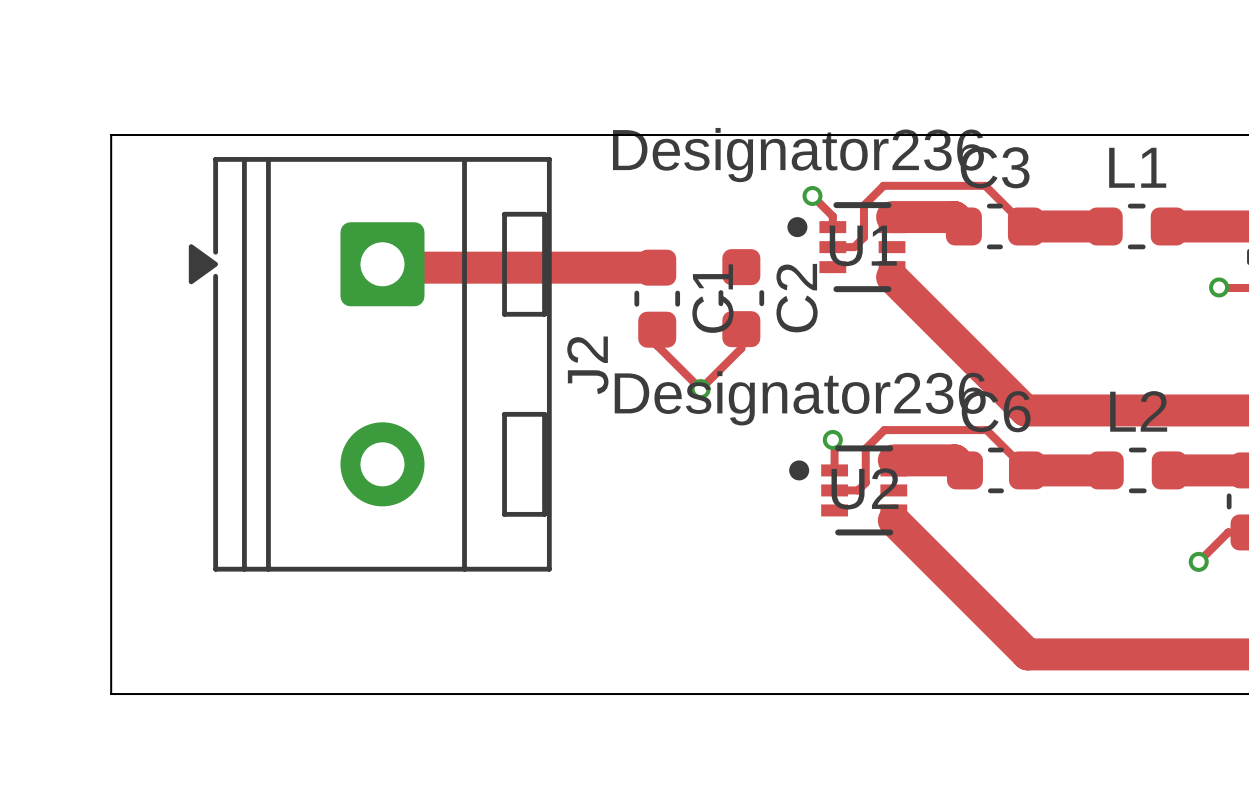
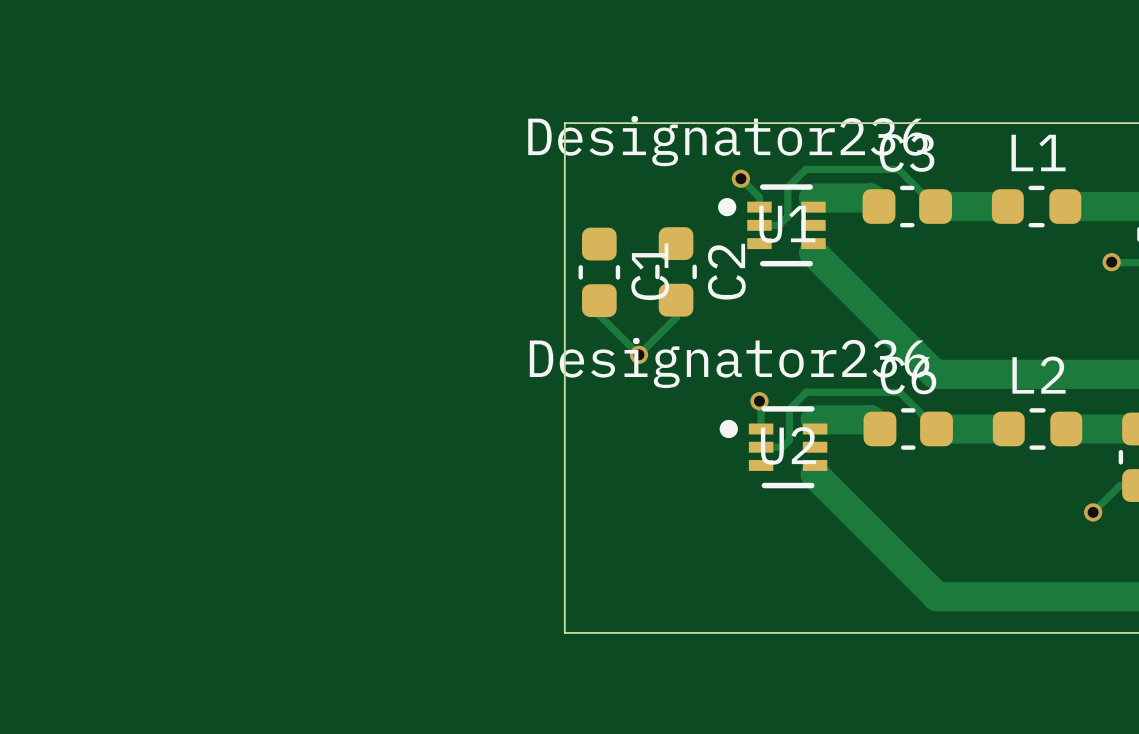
board edge: (619, 135) (111, 135) (111, 694) (619, 694) -> (564, 123) (564, 632)
track: (382, 264) (385, 267) (657, 267) -> none
J2: (370, 364) -> none

